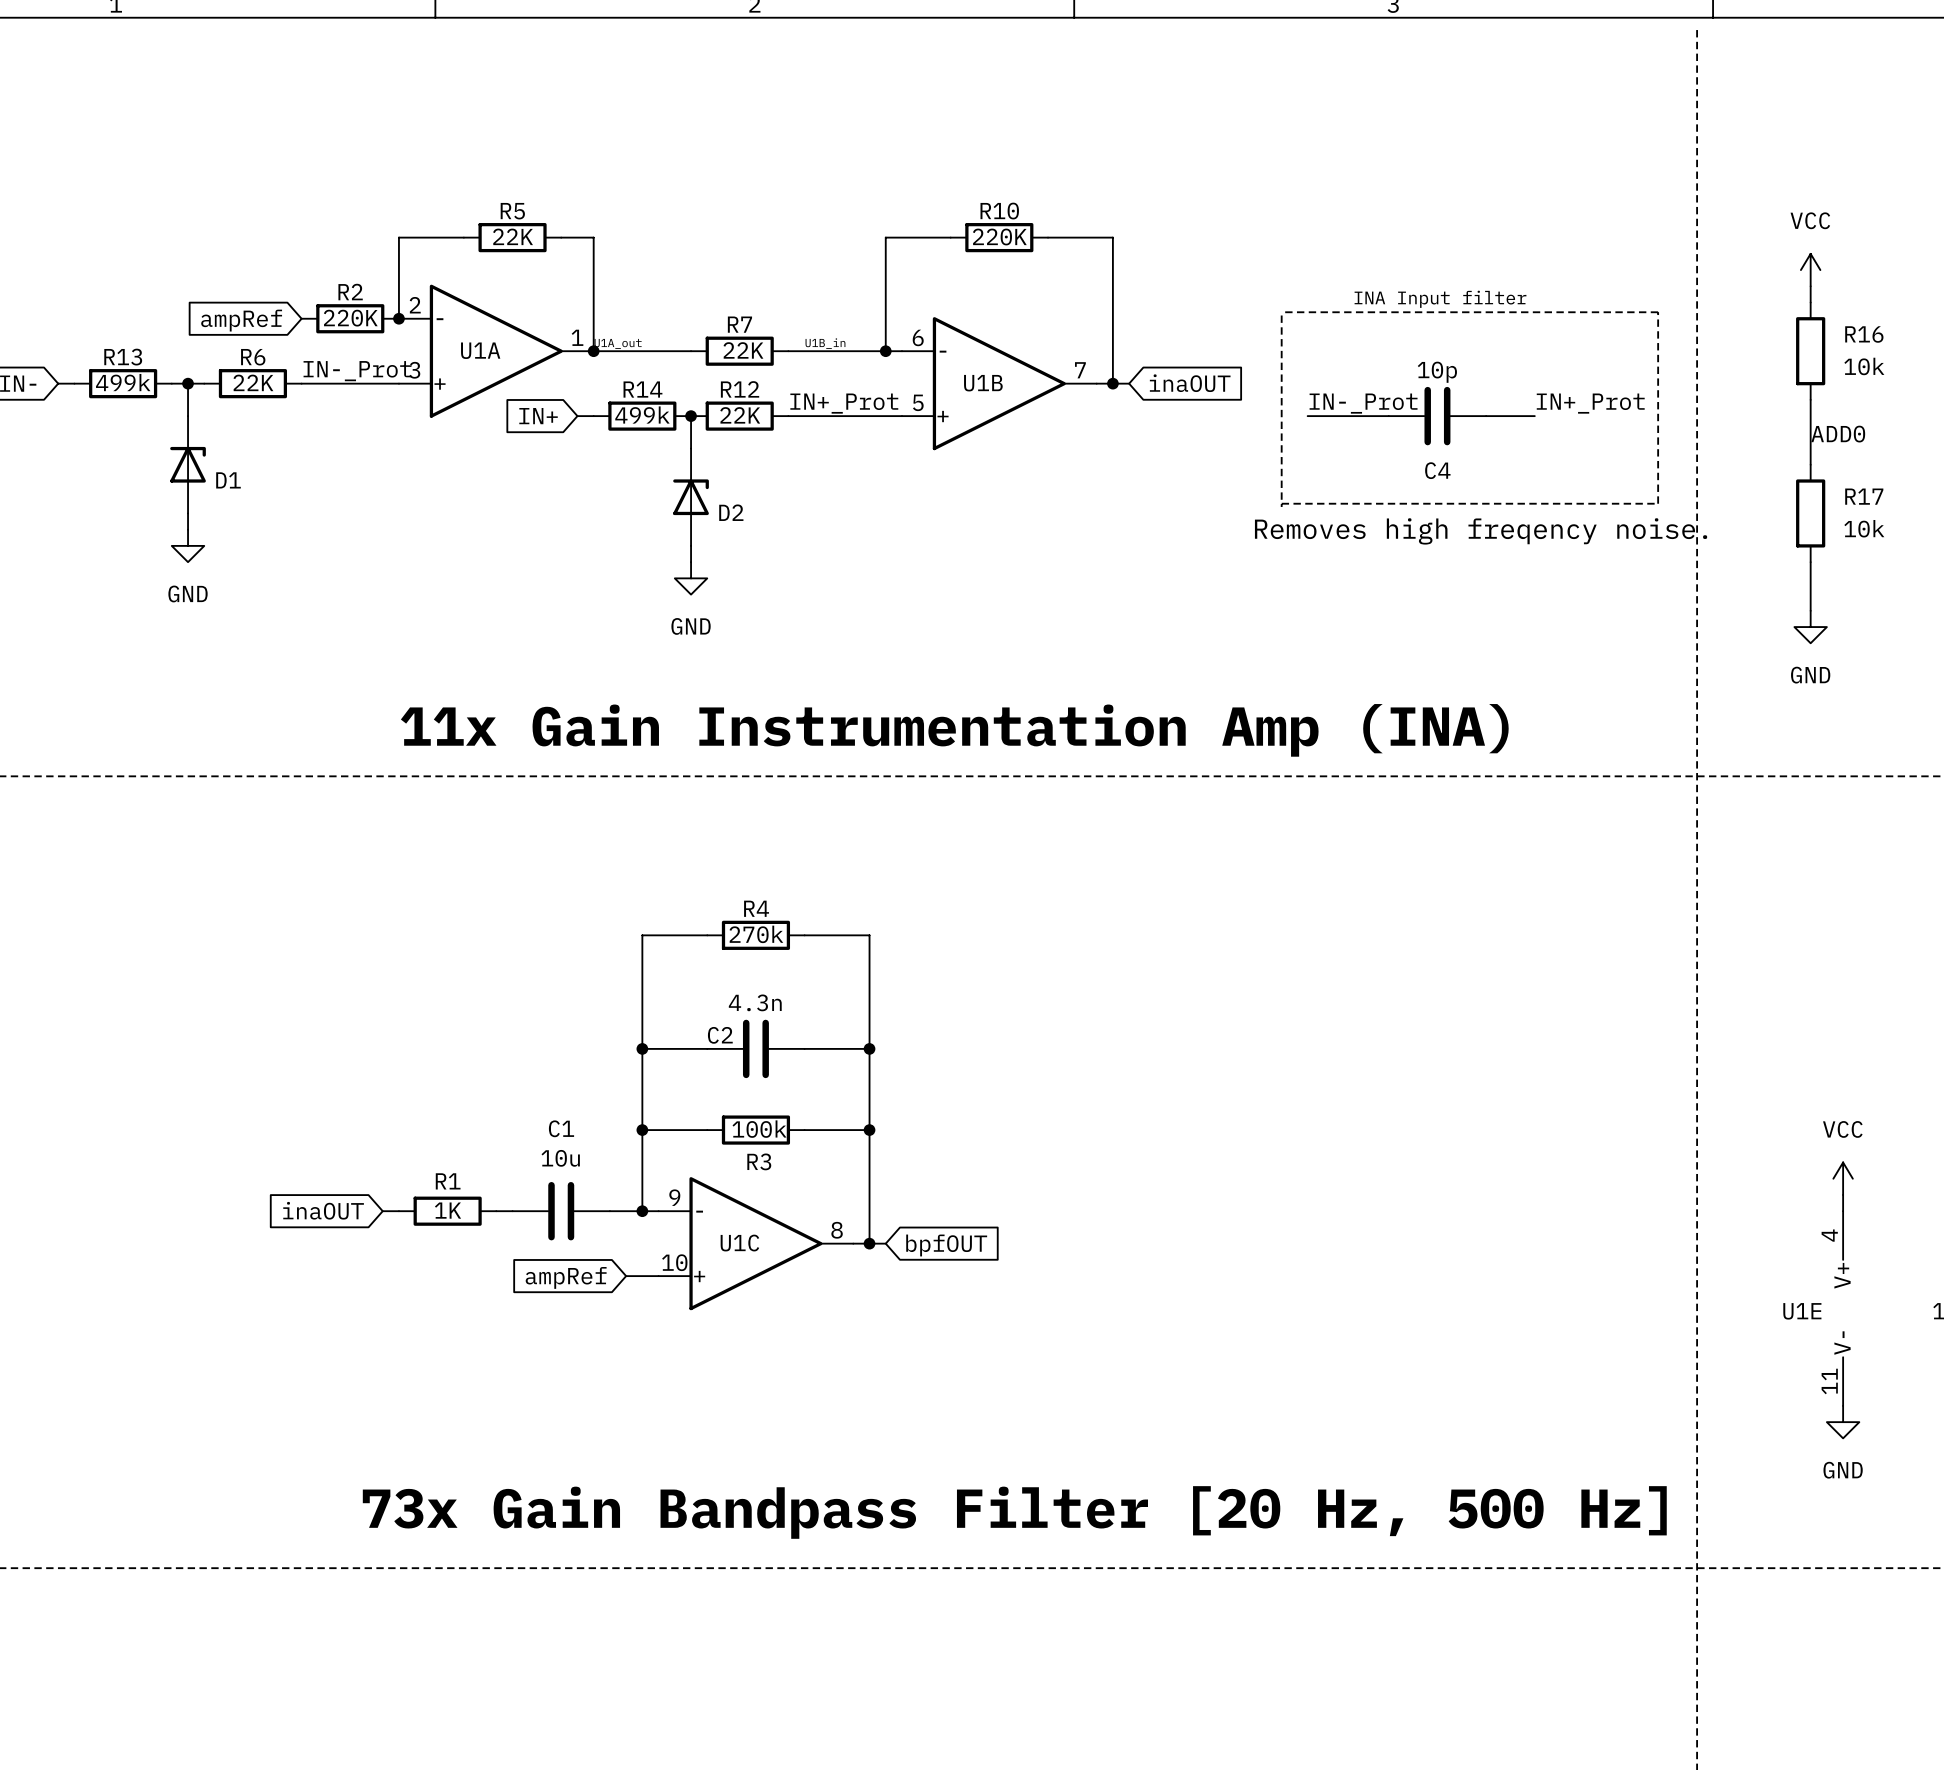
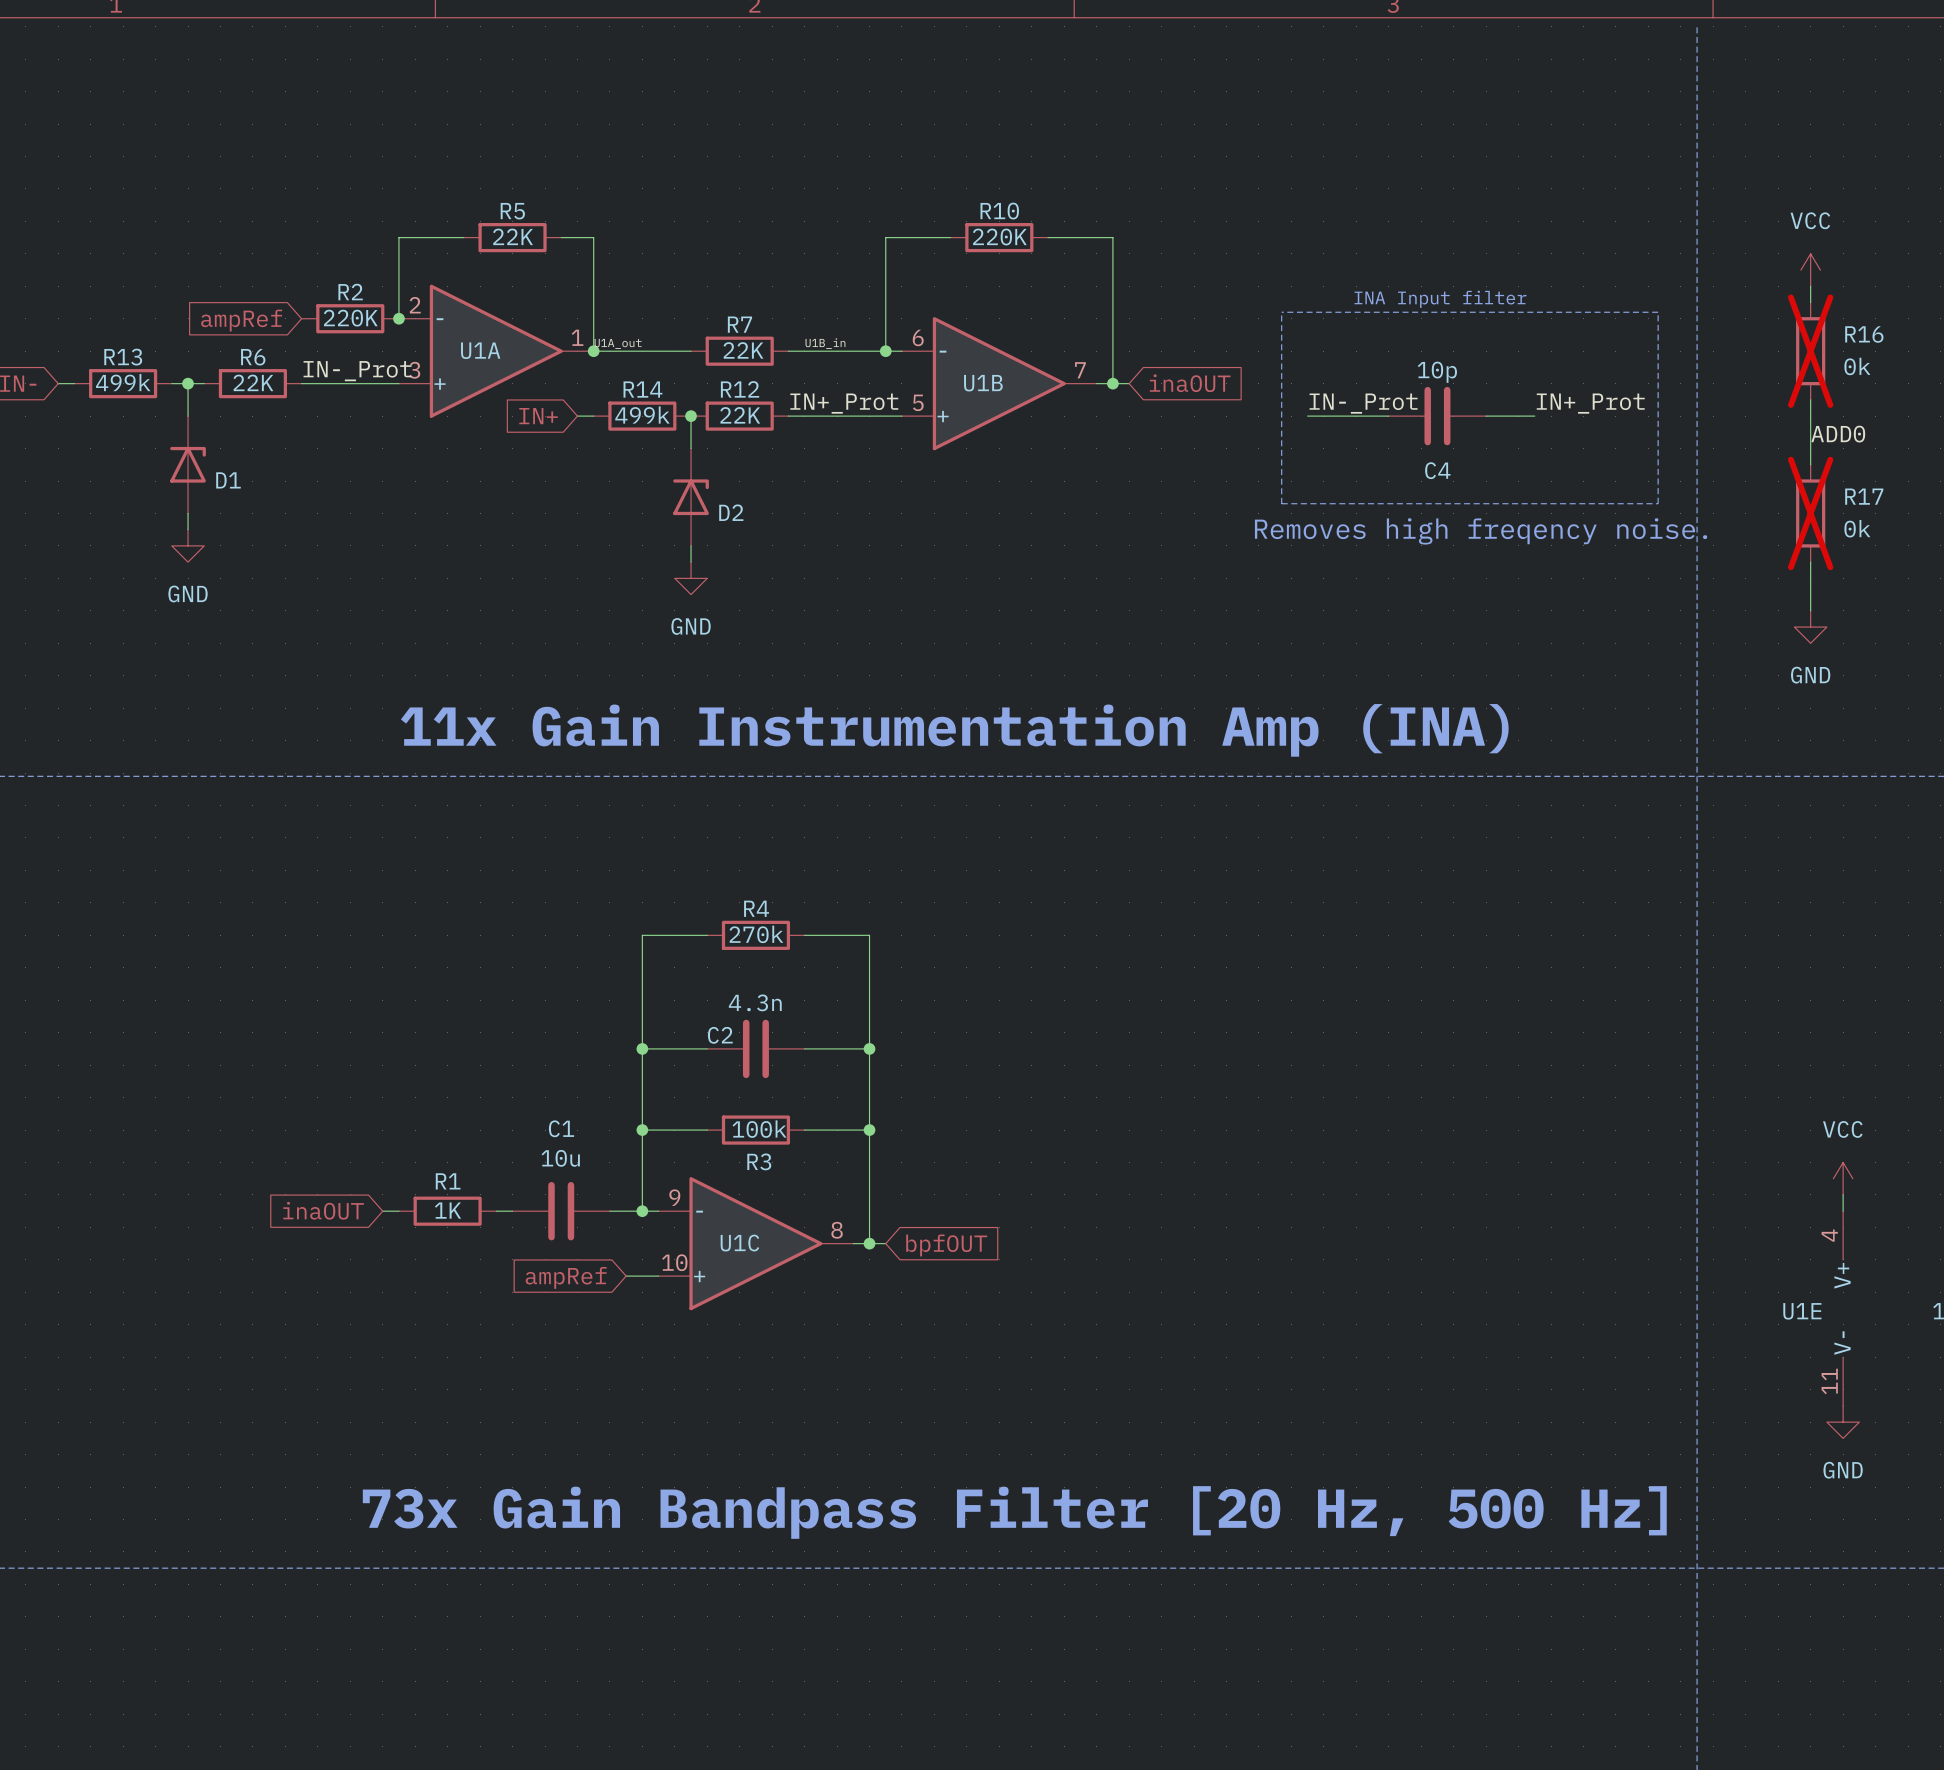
R16 do-not-place cross: none -> (1810, 351)
R16 value: 10k (1864, 366) -> 0k (1857, 366)
R17 do-not-place cross: none -> (1810, 513)
R17 value: 10k (1864, 528) -> 0k (1857, 528)

